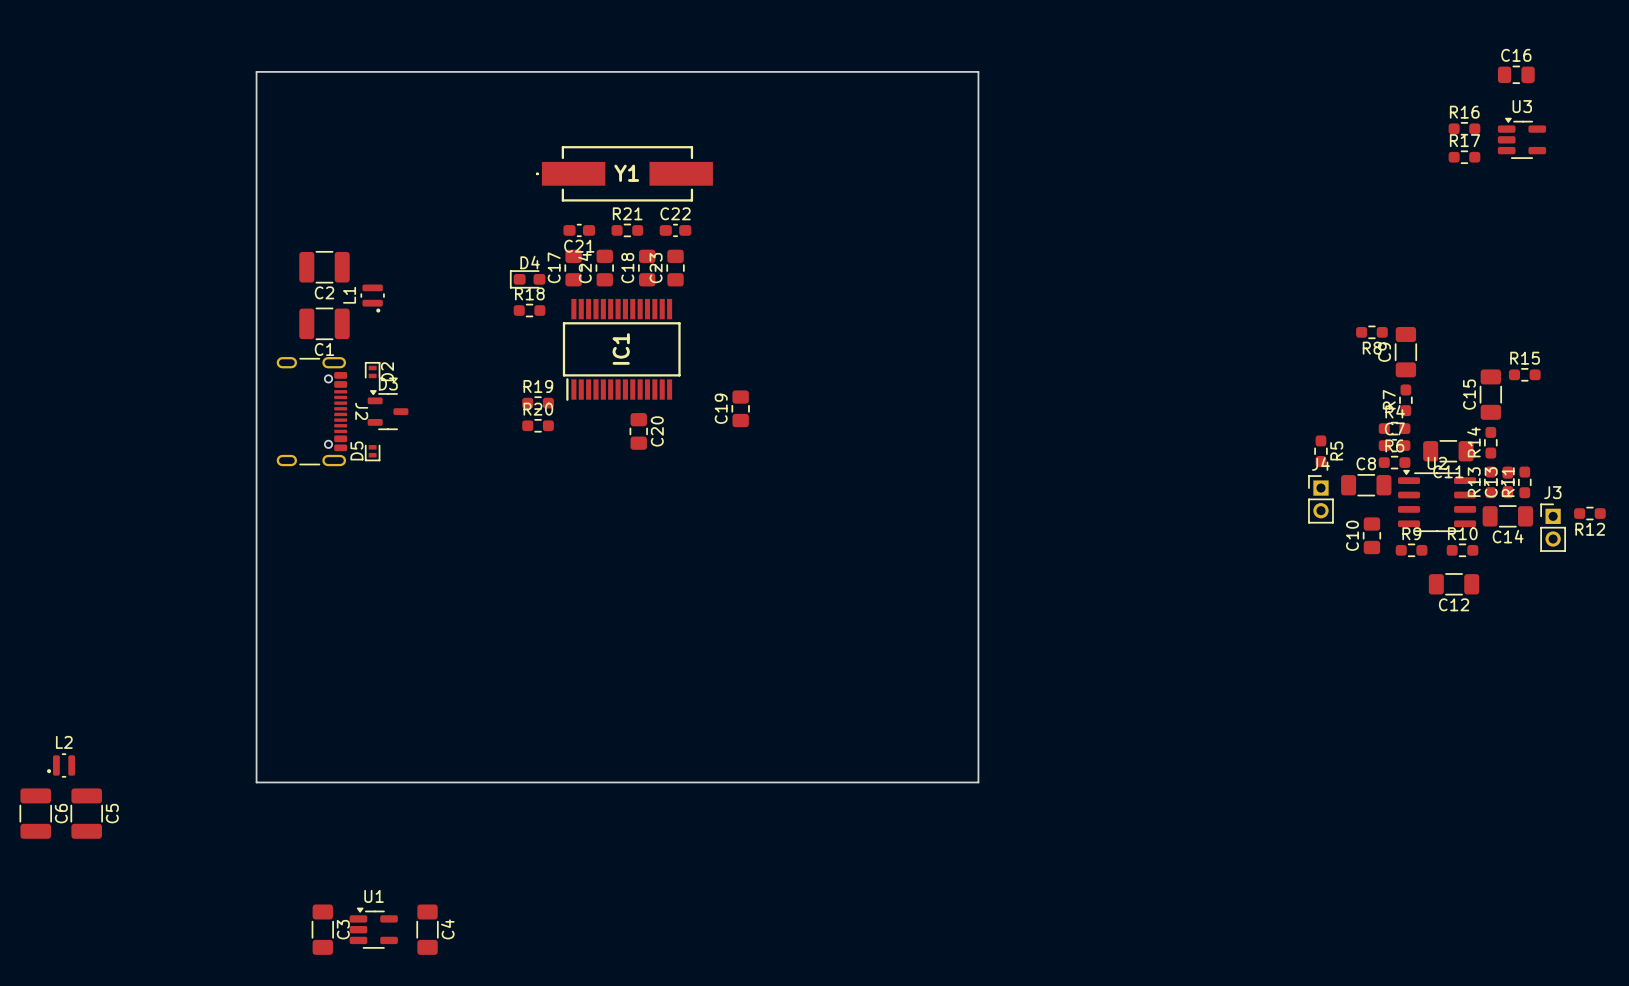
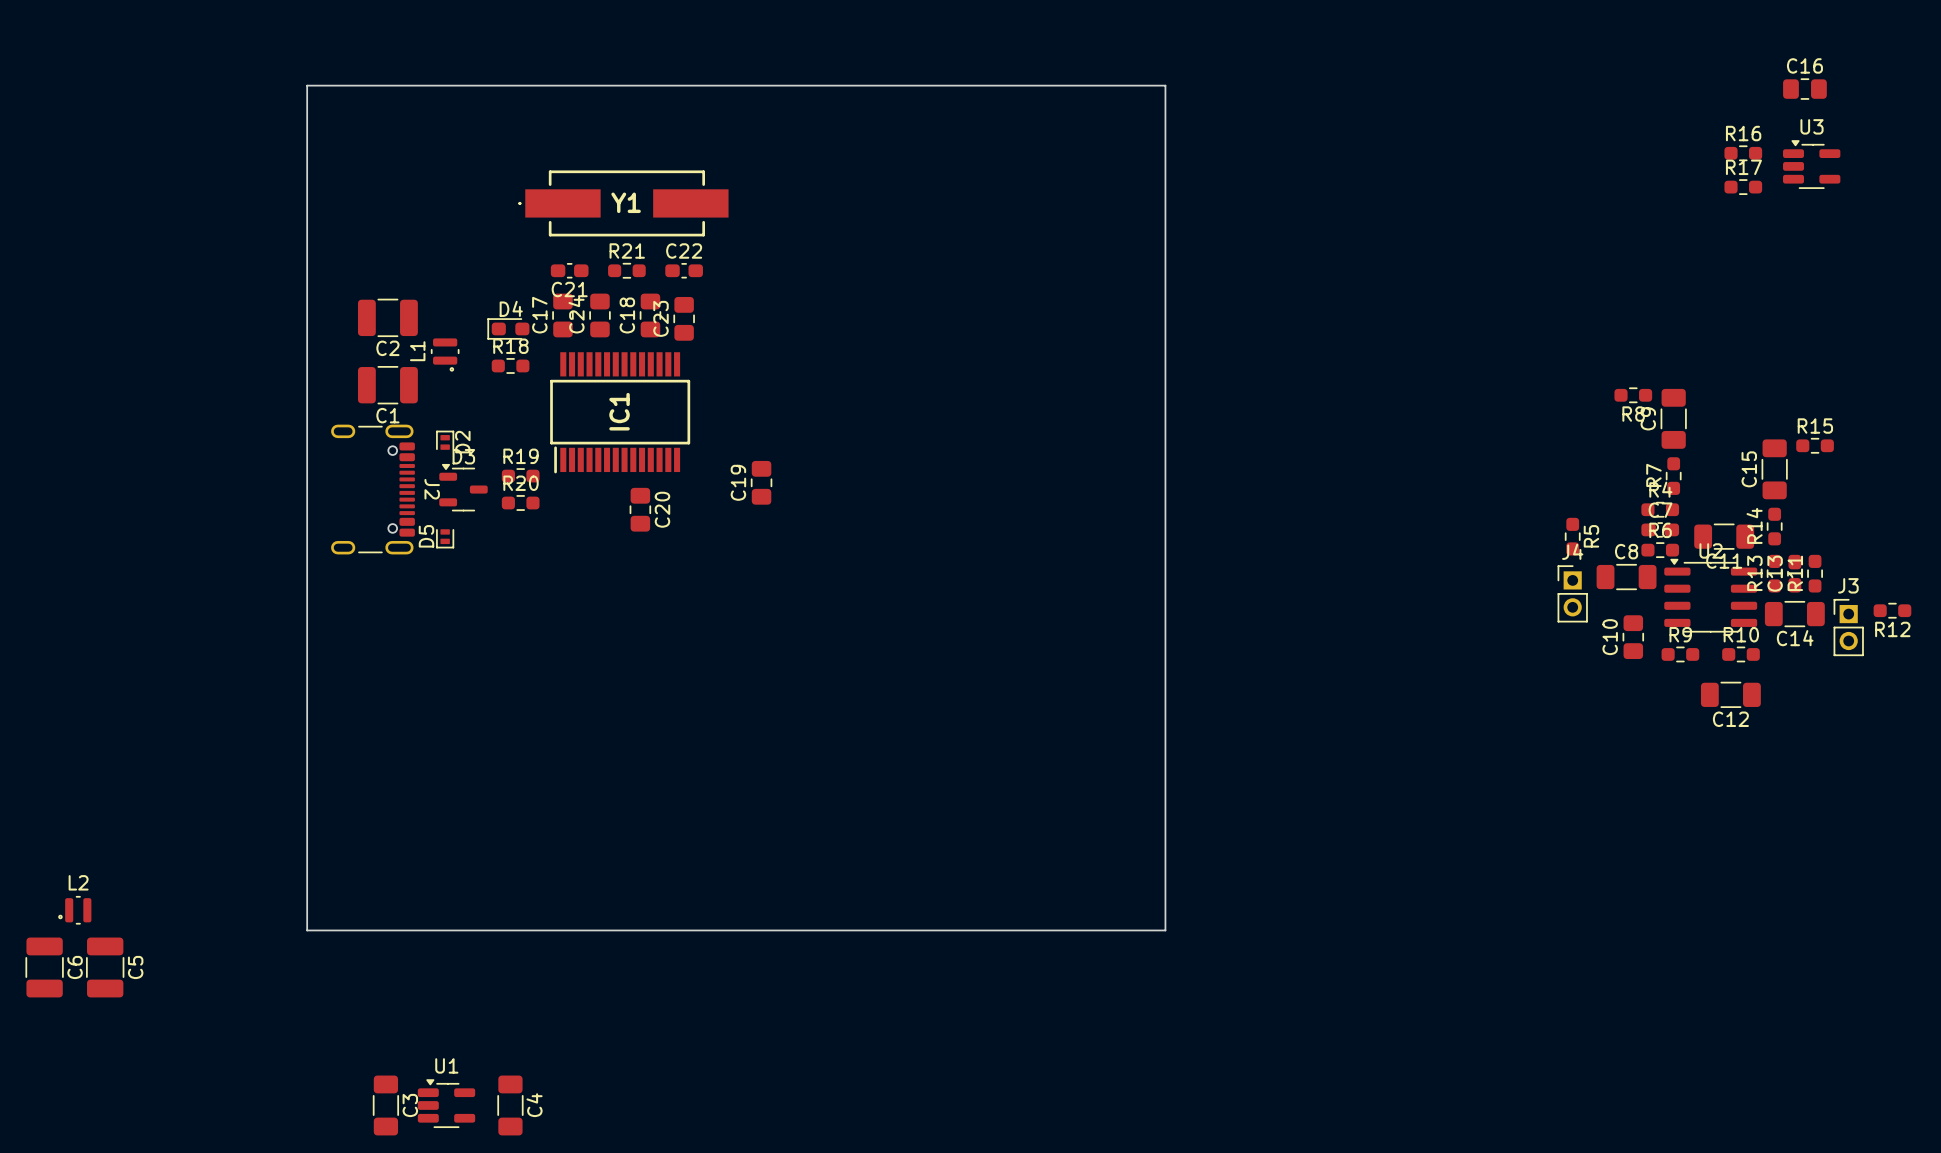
Y1 position: (624, 173) -> (623, 203)
C21 position: (579, 230) -> (569, 270)
R21 position: (627, 230) -> (626, 270)
C22 position: (675, 230) -> (684, 270)
C17: none -> (562, 315)
C17 name: C17 (554, 267) -> C23 (661, 318)
C24 position: (604, 268) -> (599, 315)
C18 position: (647, 268) -> (650, 315)
C23: (675, 268) -> none
D4 position: (527, 279) -> (508, 328)
R18 position: (529, 310) -> (510, 365)
IC1 position: (621, 349) -> (620, 412)
R19 position: (538, 403) -> (520, 476)
C19 position: (740, 408) -> (761, 482)
R20 position: (538, 425) -> (520, 503)
C20 position: (638, 431) -> (640, 509)

